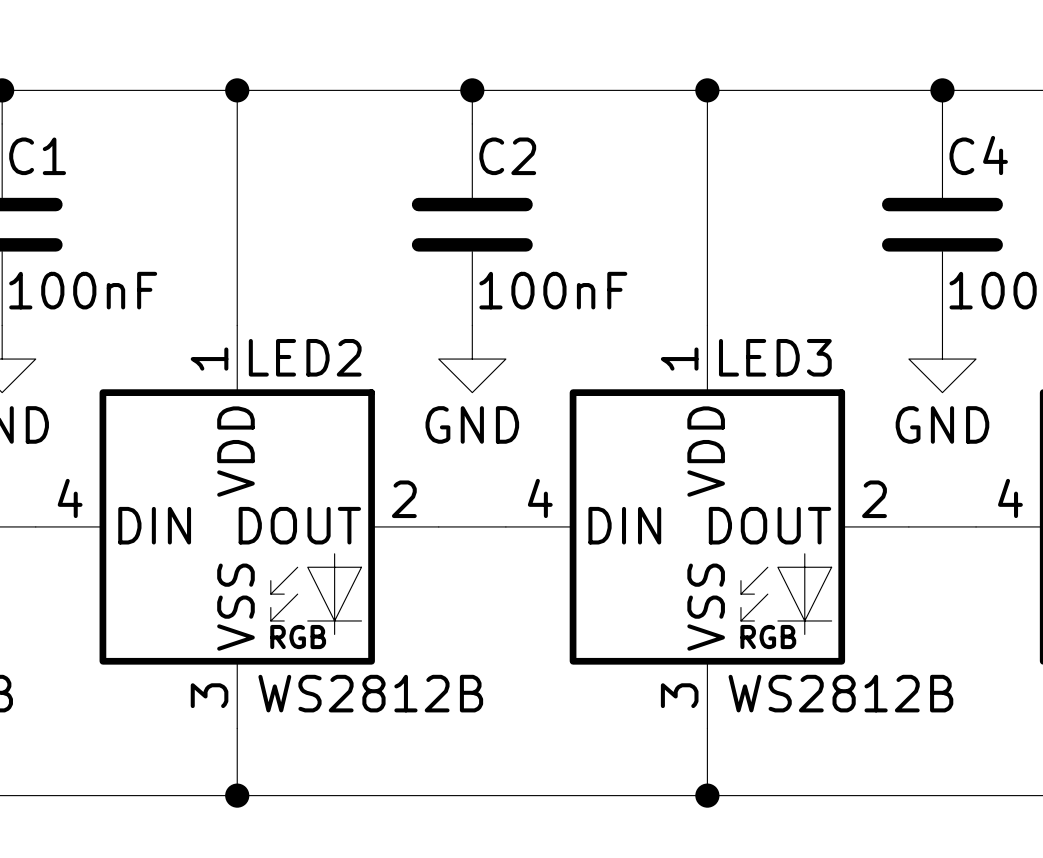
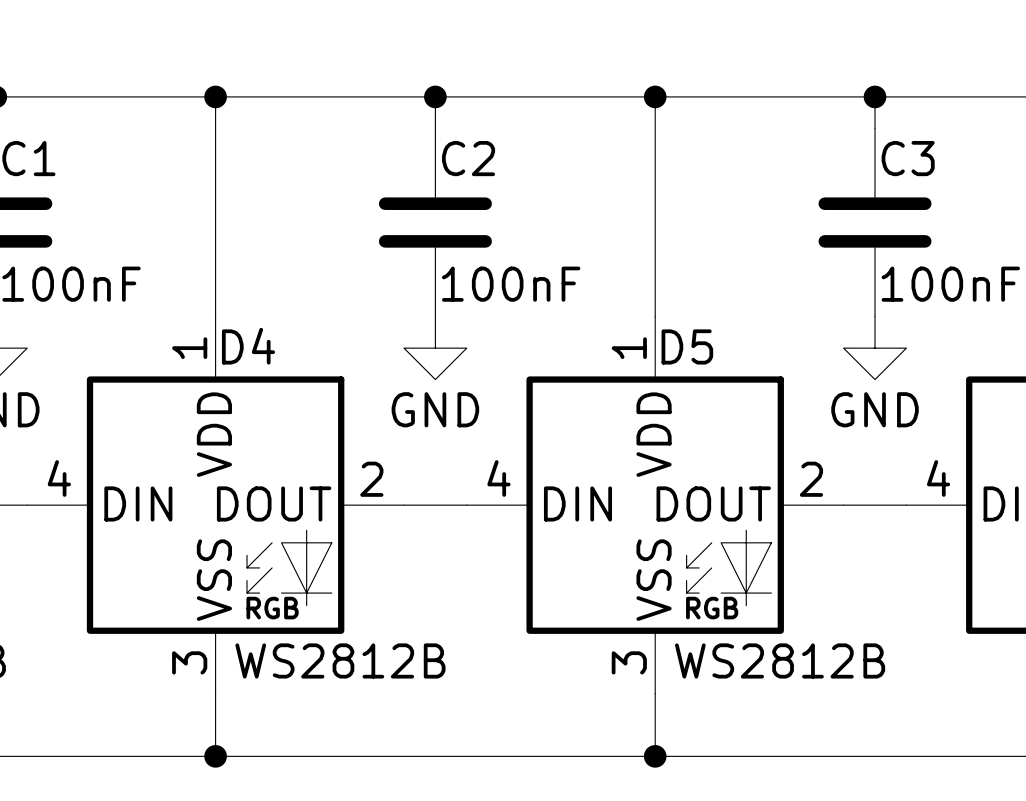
C4 name: C4 (978, 155) -> C3 (908, 158)
LED2 name: LED2 (305, 357) -> D4 (248, 346)
LED3 name: LED3 (775, 357) -> D5 (687, 346)

